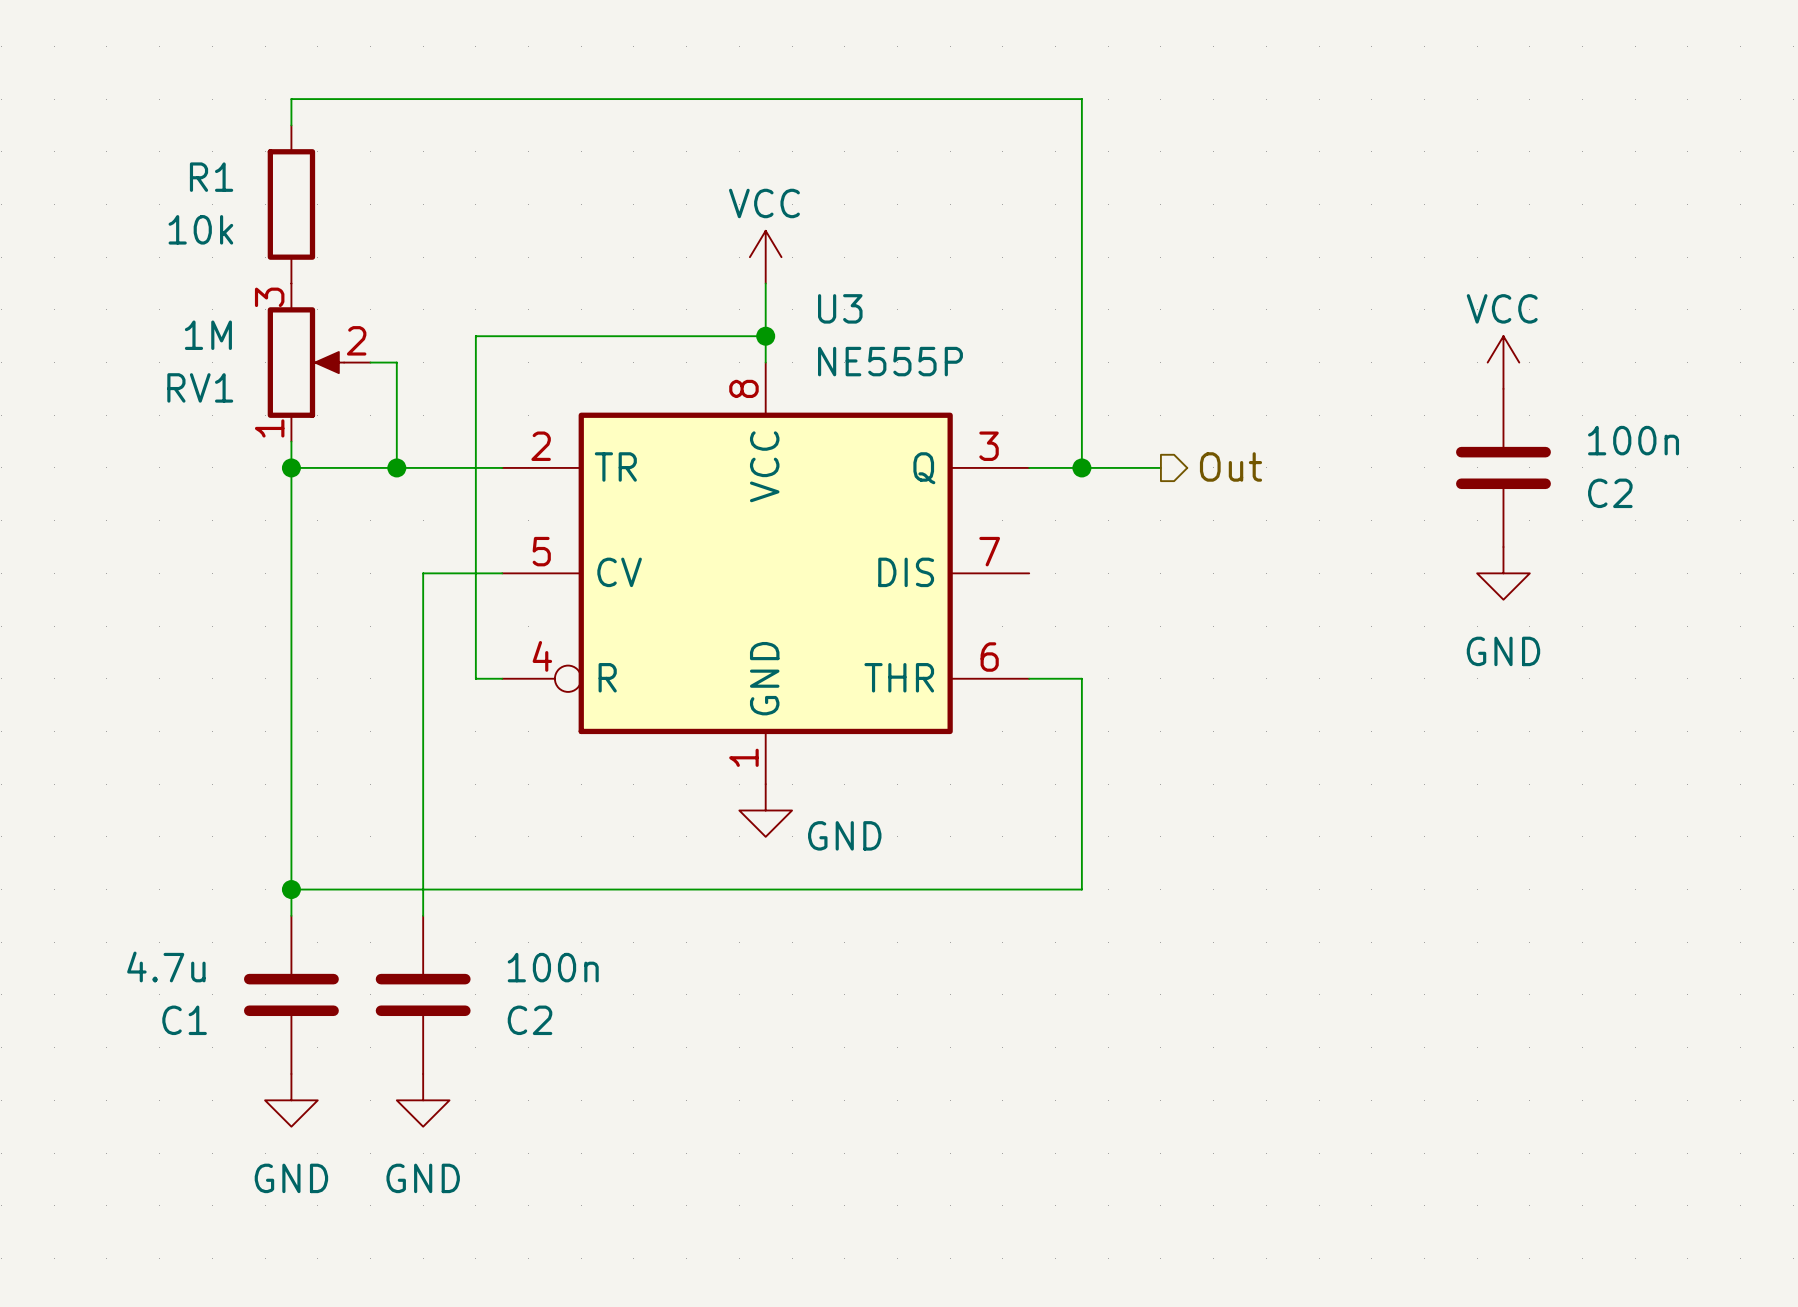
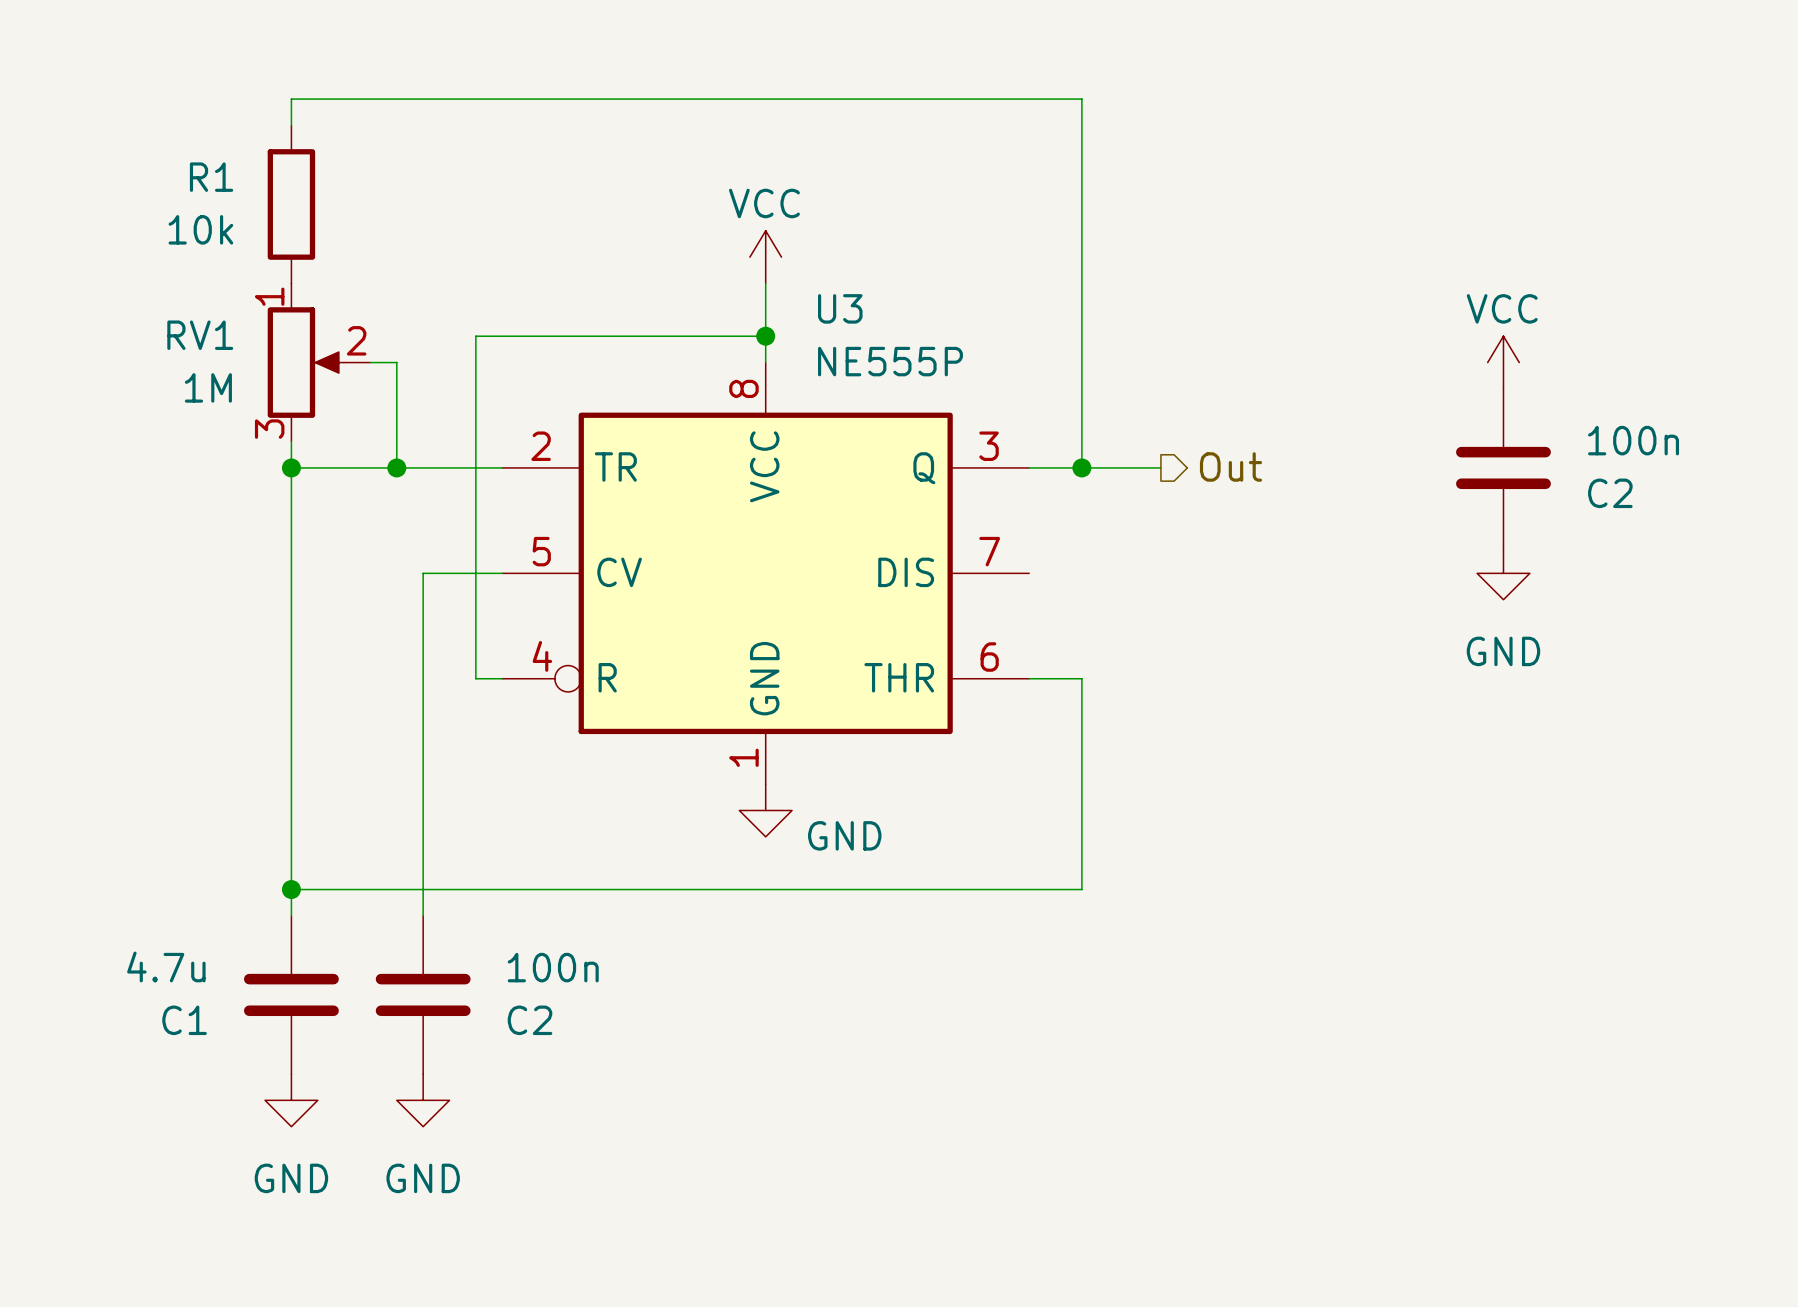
RV1 flip: as is (305, 362) -> up-down (305, 362)

